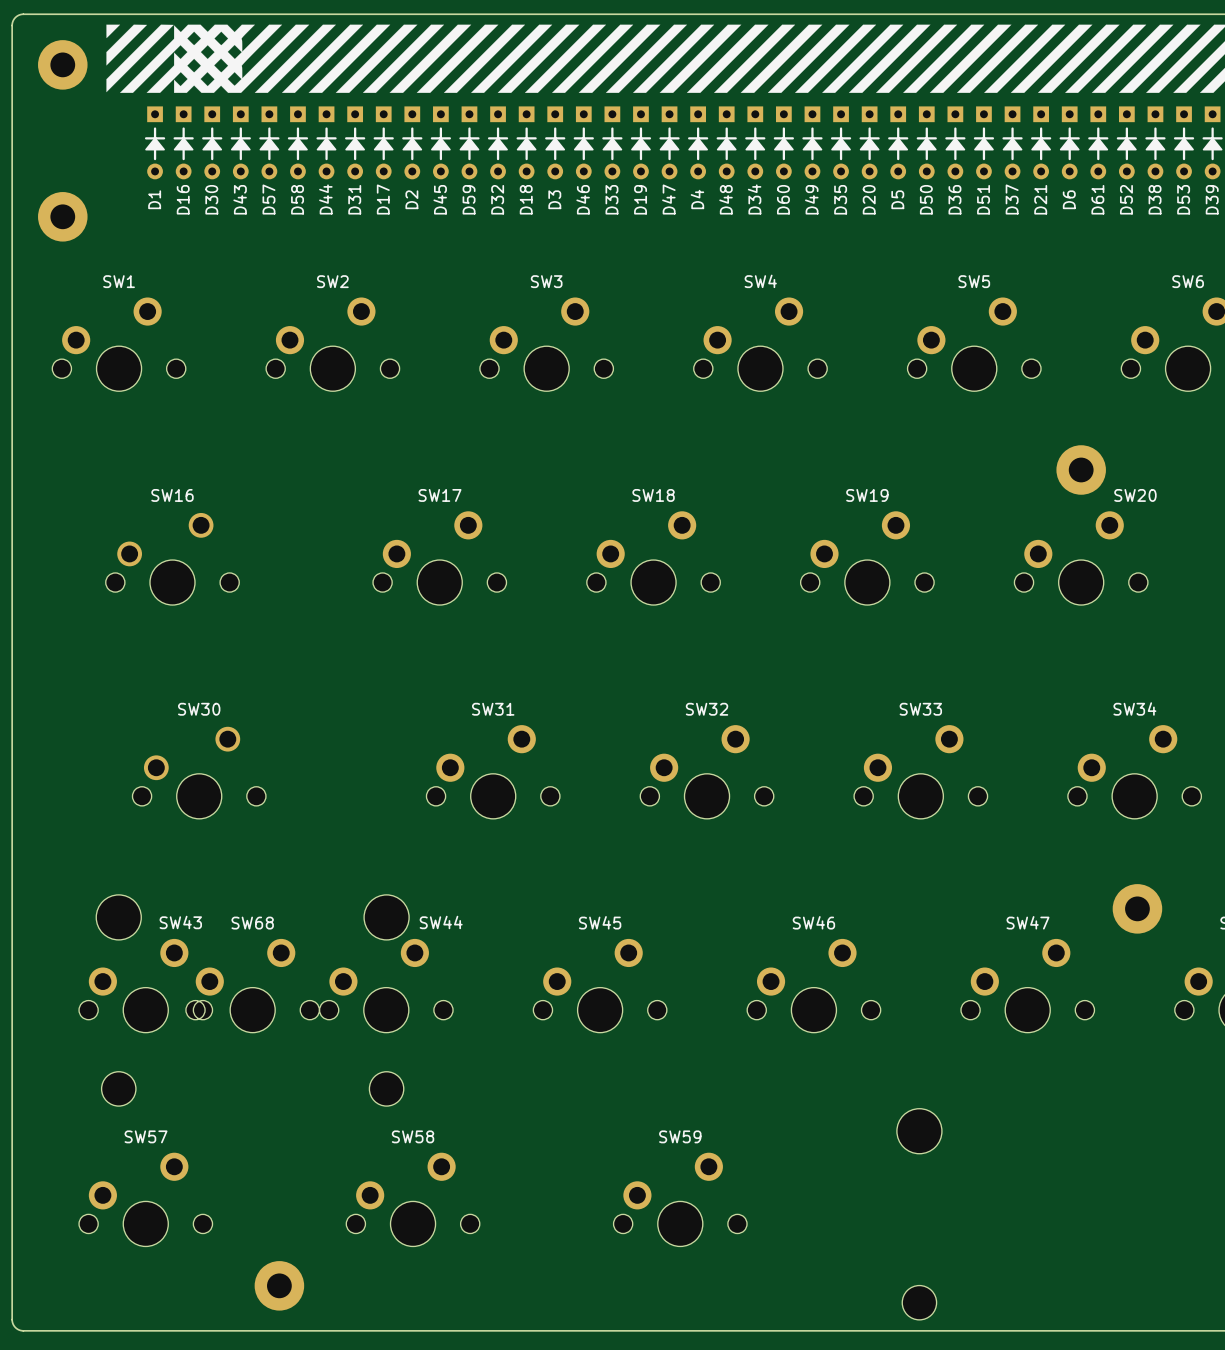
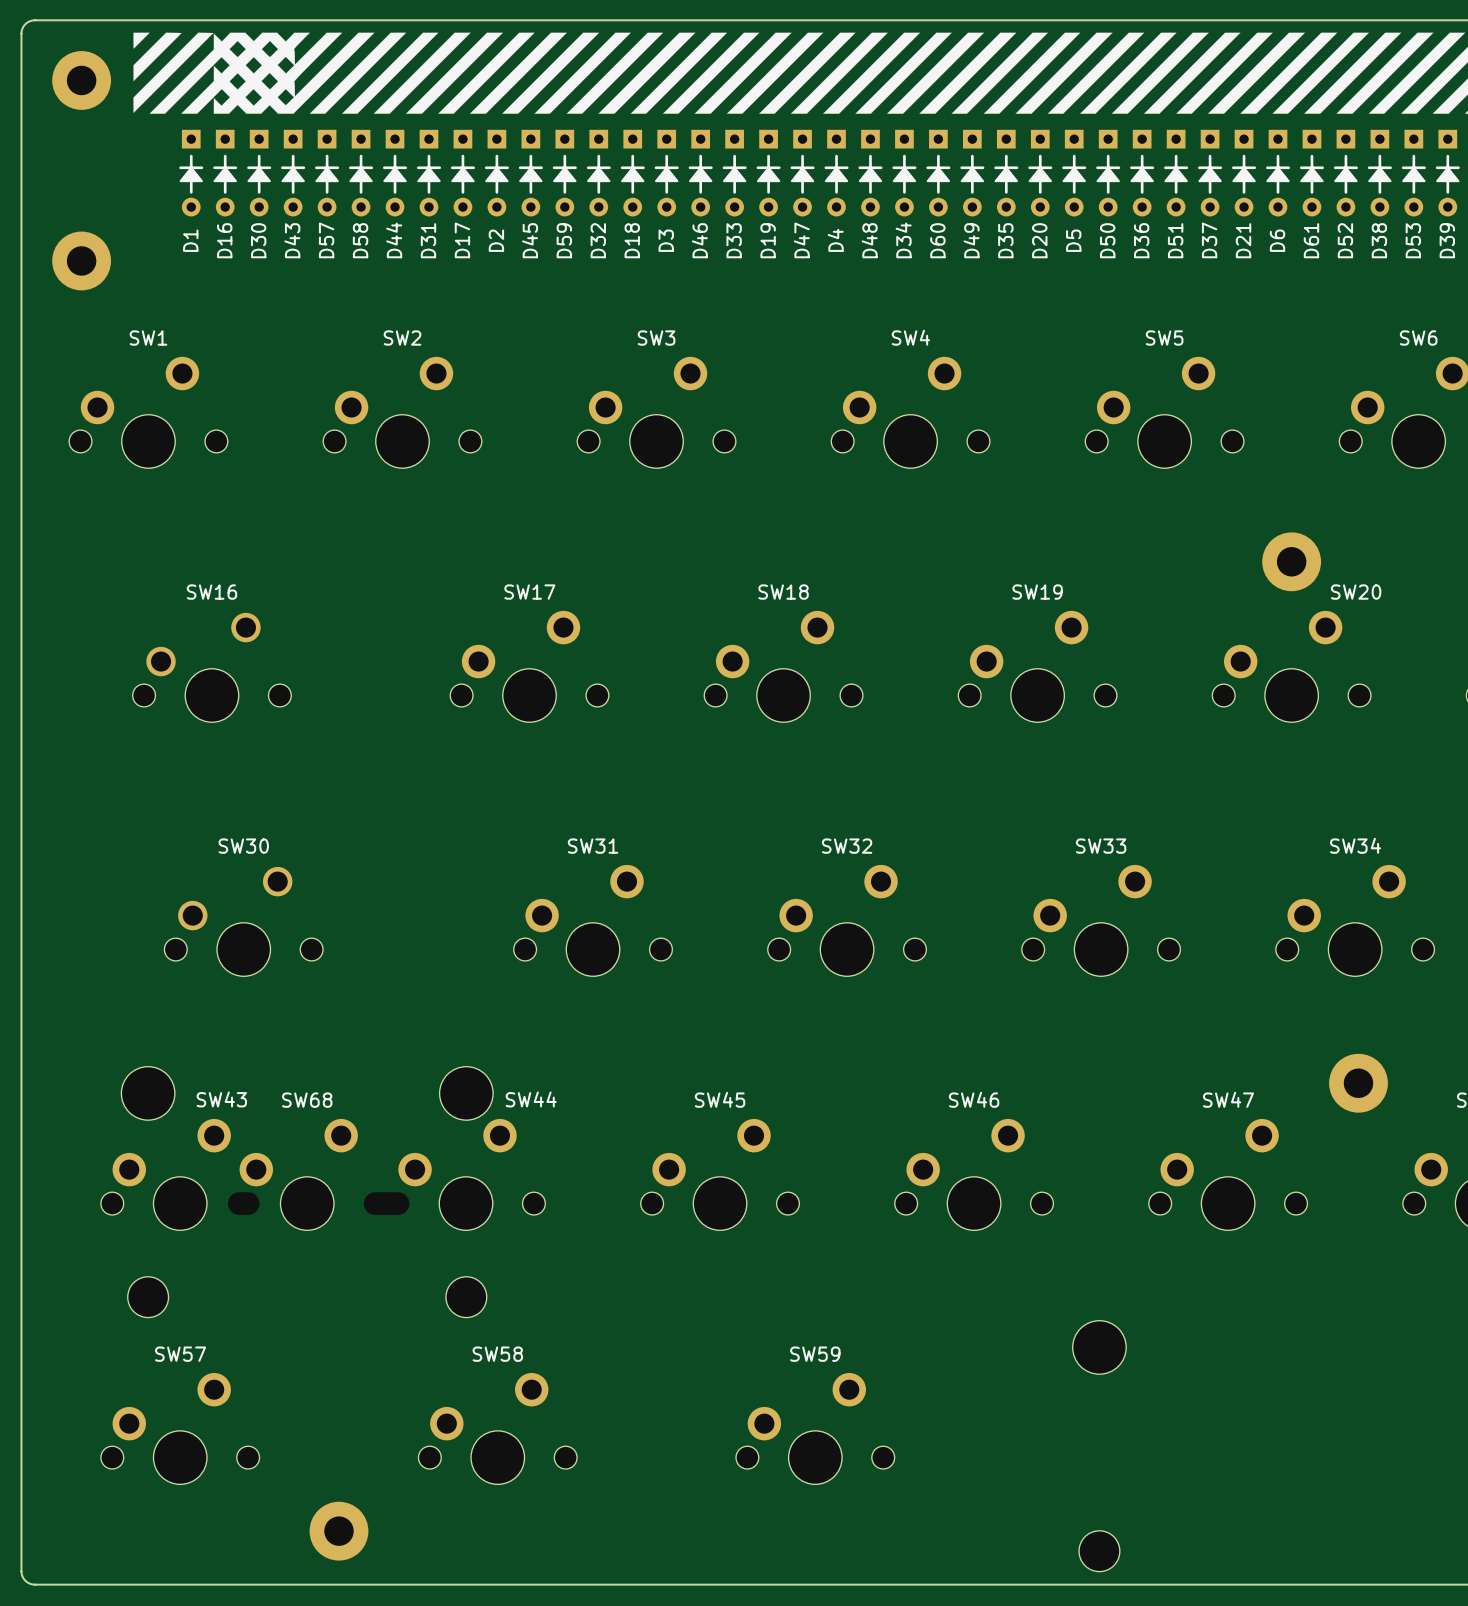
SW43 footprint: [79, 938, 213, 1033] -> [100, 1118, 260, 1231]
SW68 footprint: [185, 938, 320, 1033] -> [239, 1118, 358, 1231]
SW44 footprint: [319, 938, 454, 1033] -> [363, 1118, 546, 1231]

